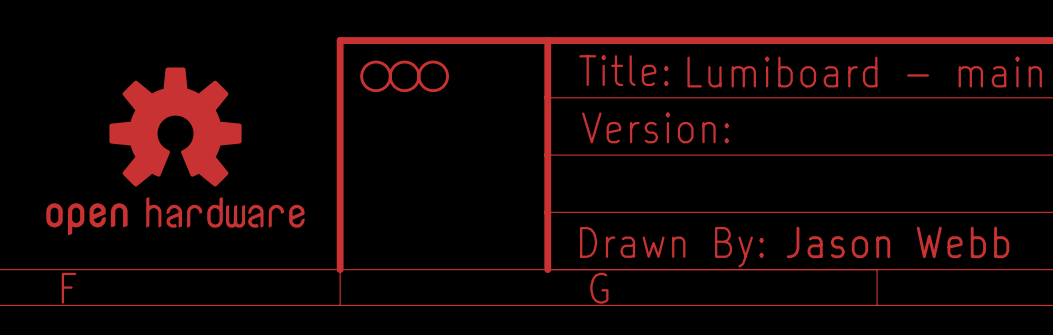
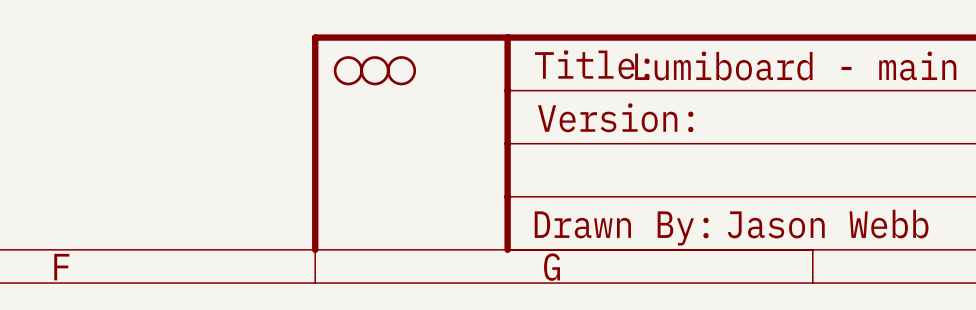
part: (175, 151) -> none

